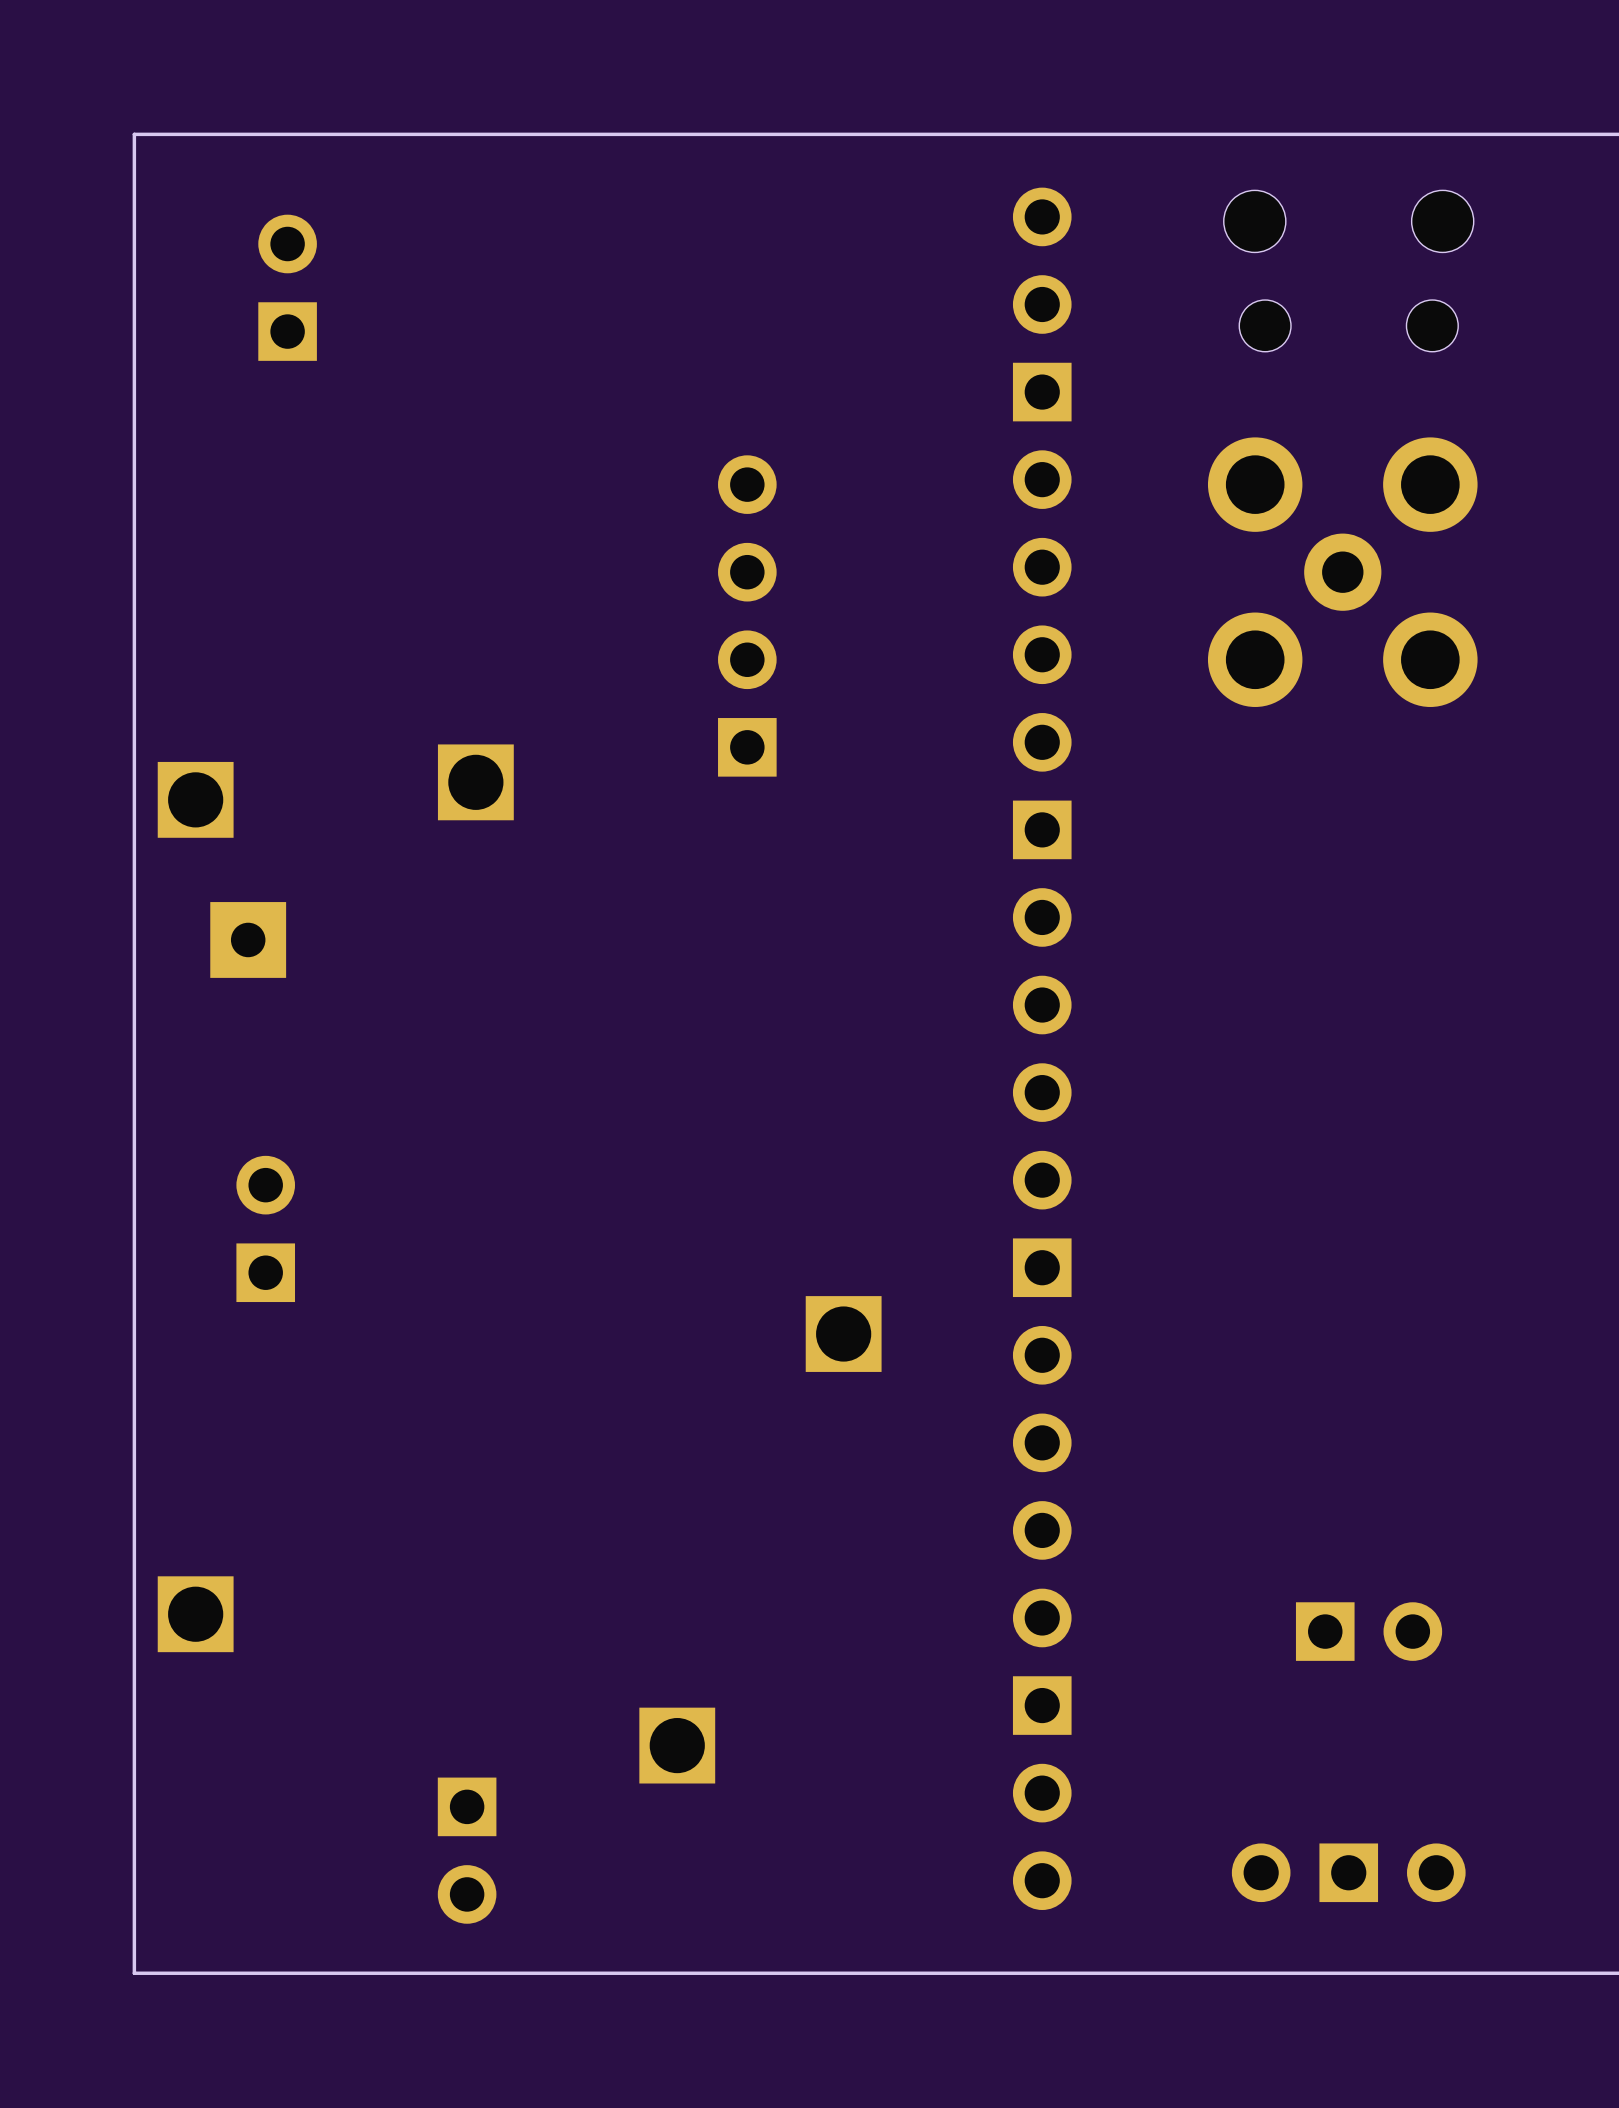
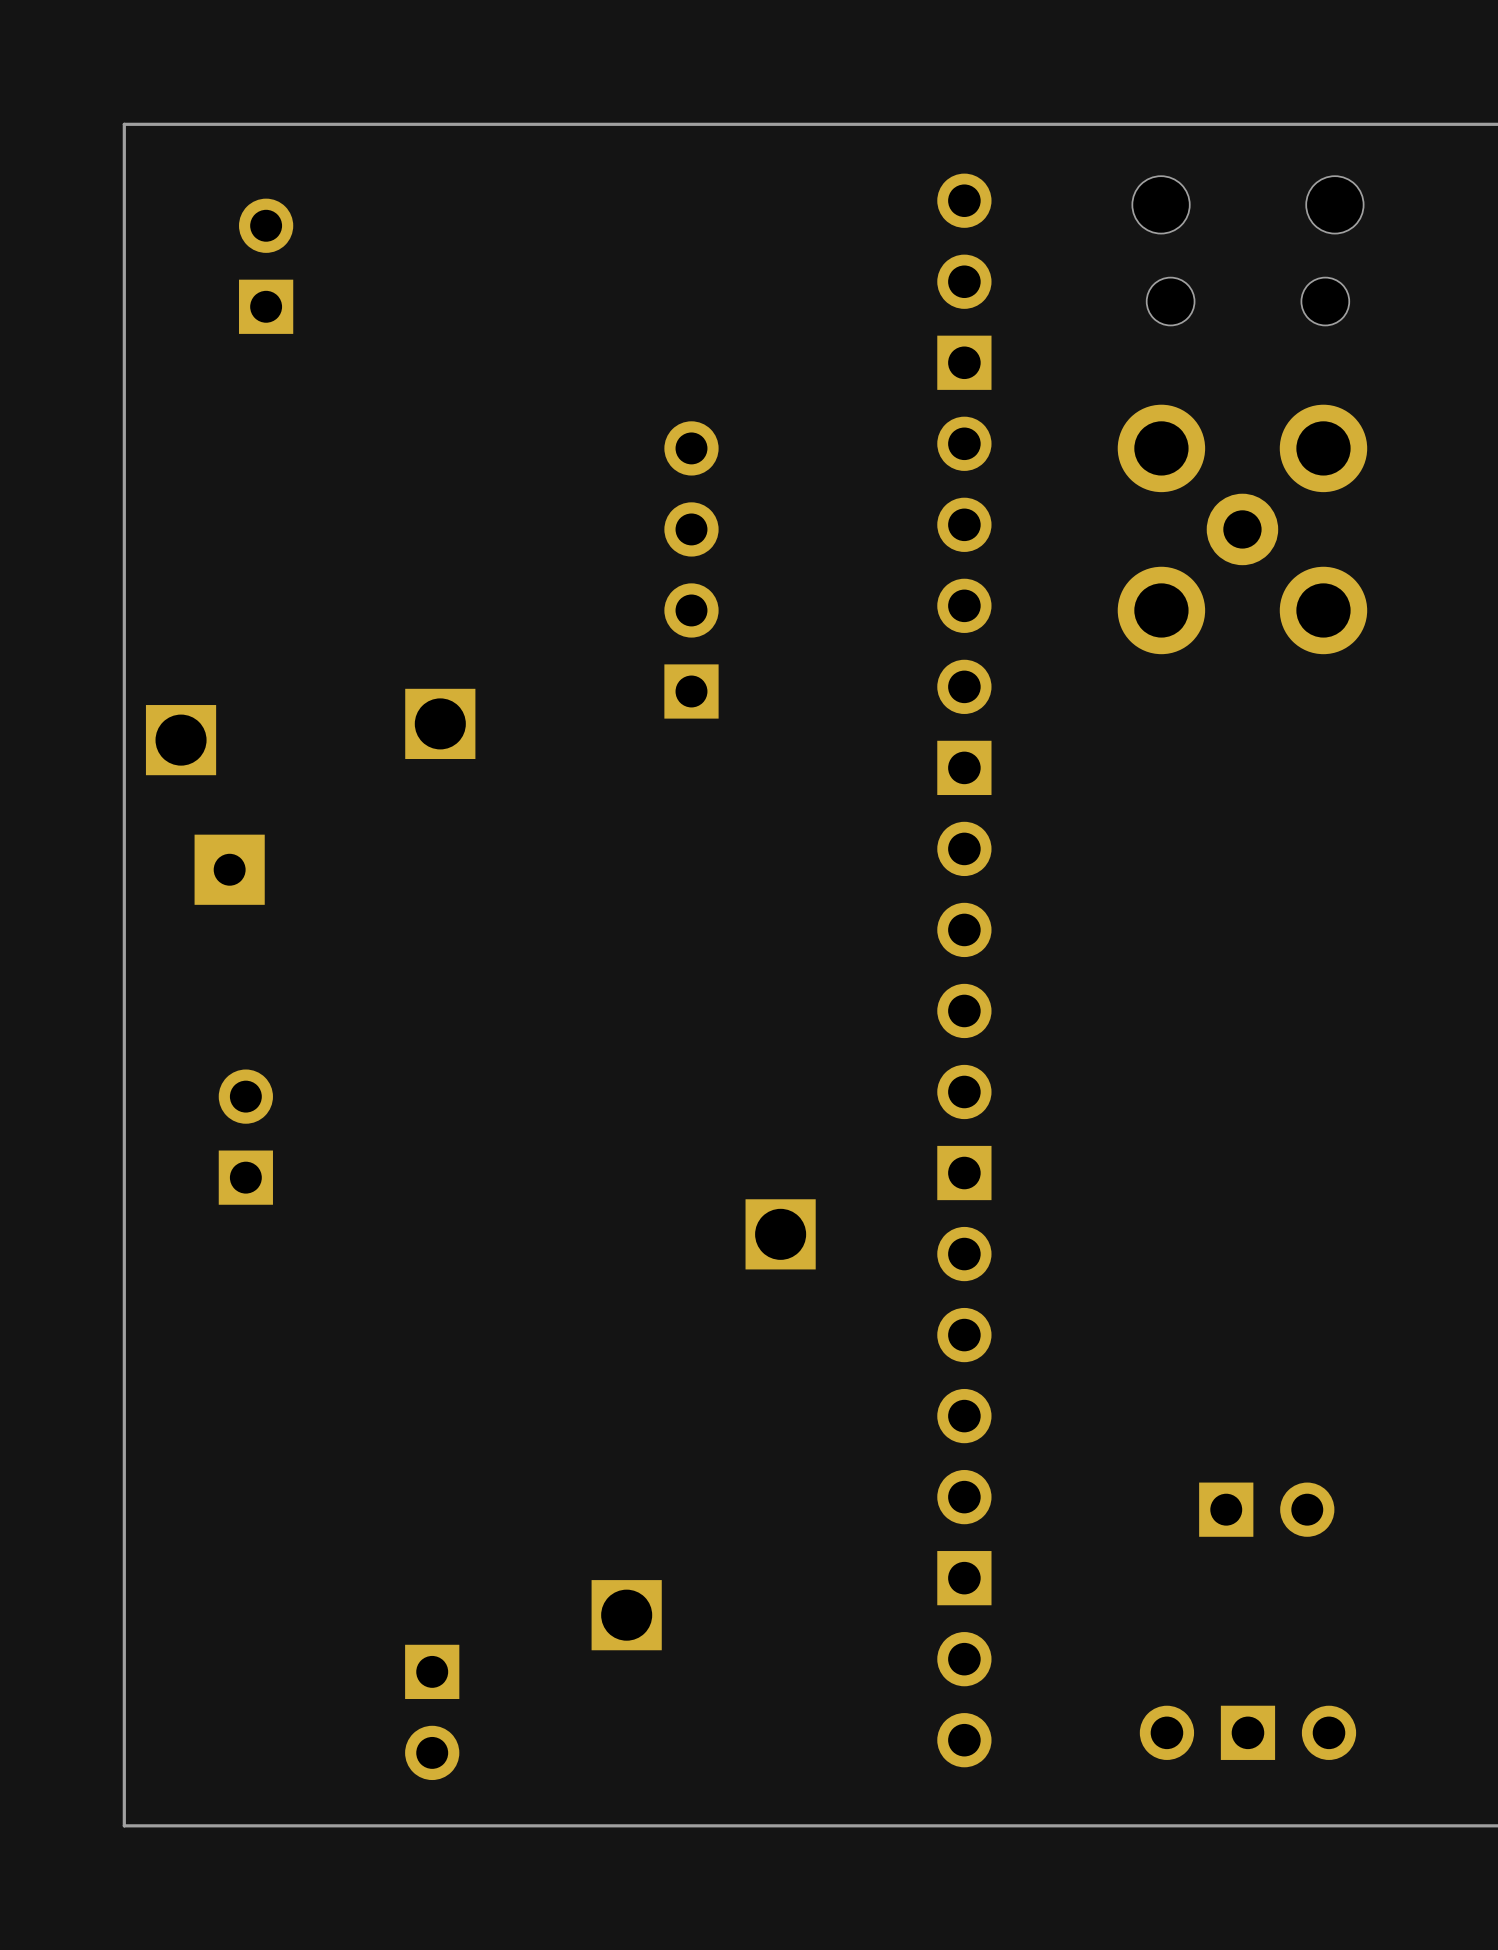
part: (195, 1614) -> none

